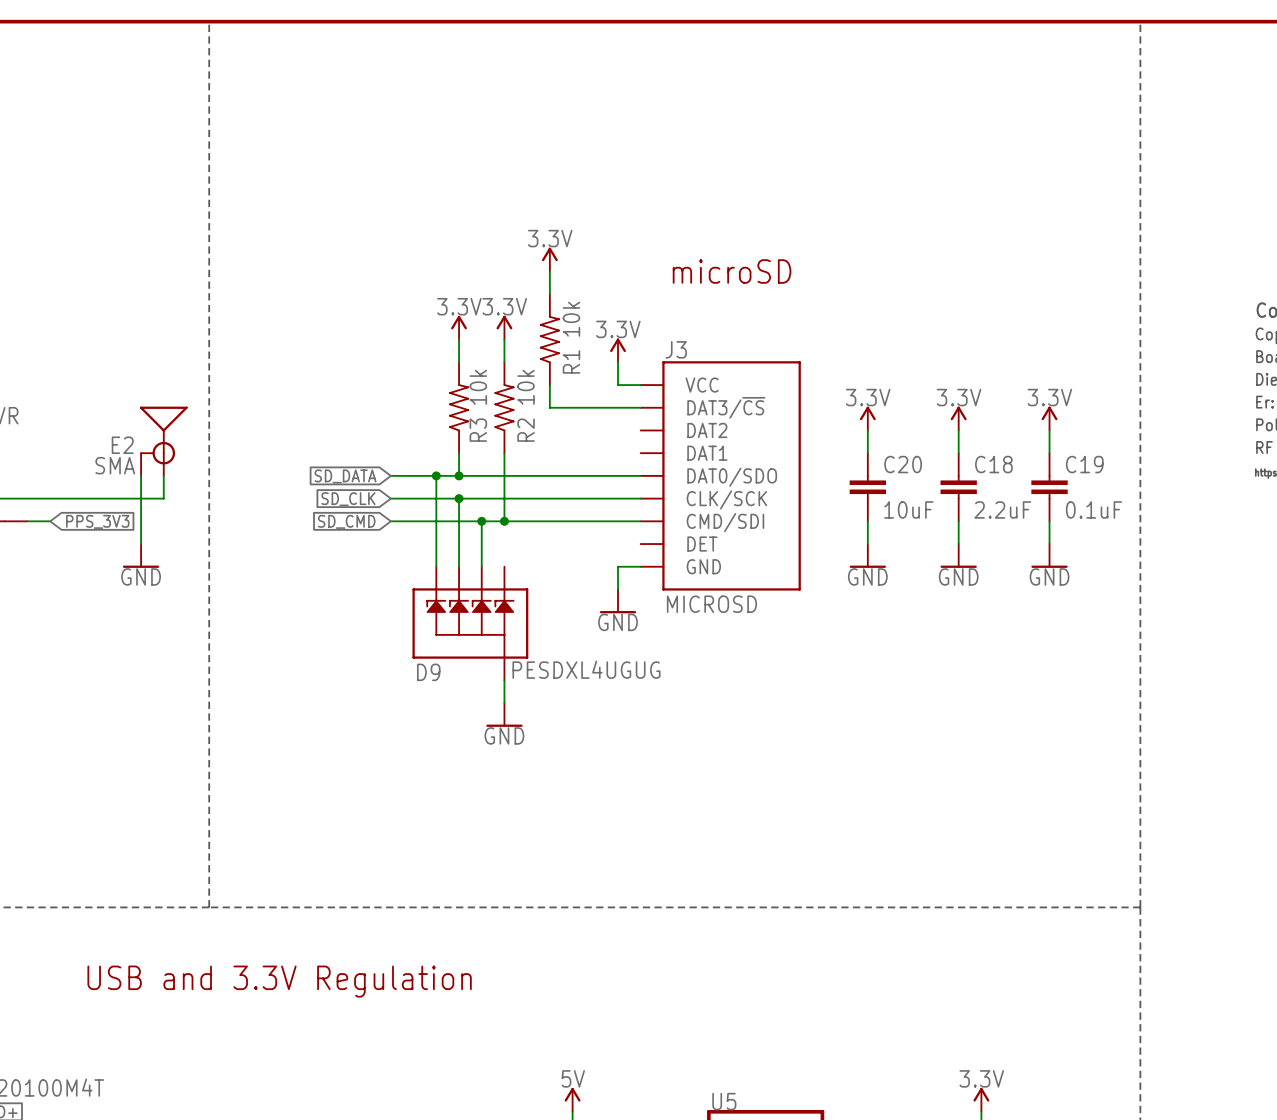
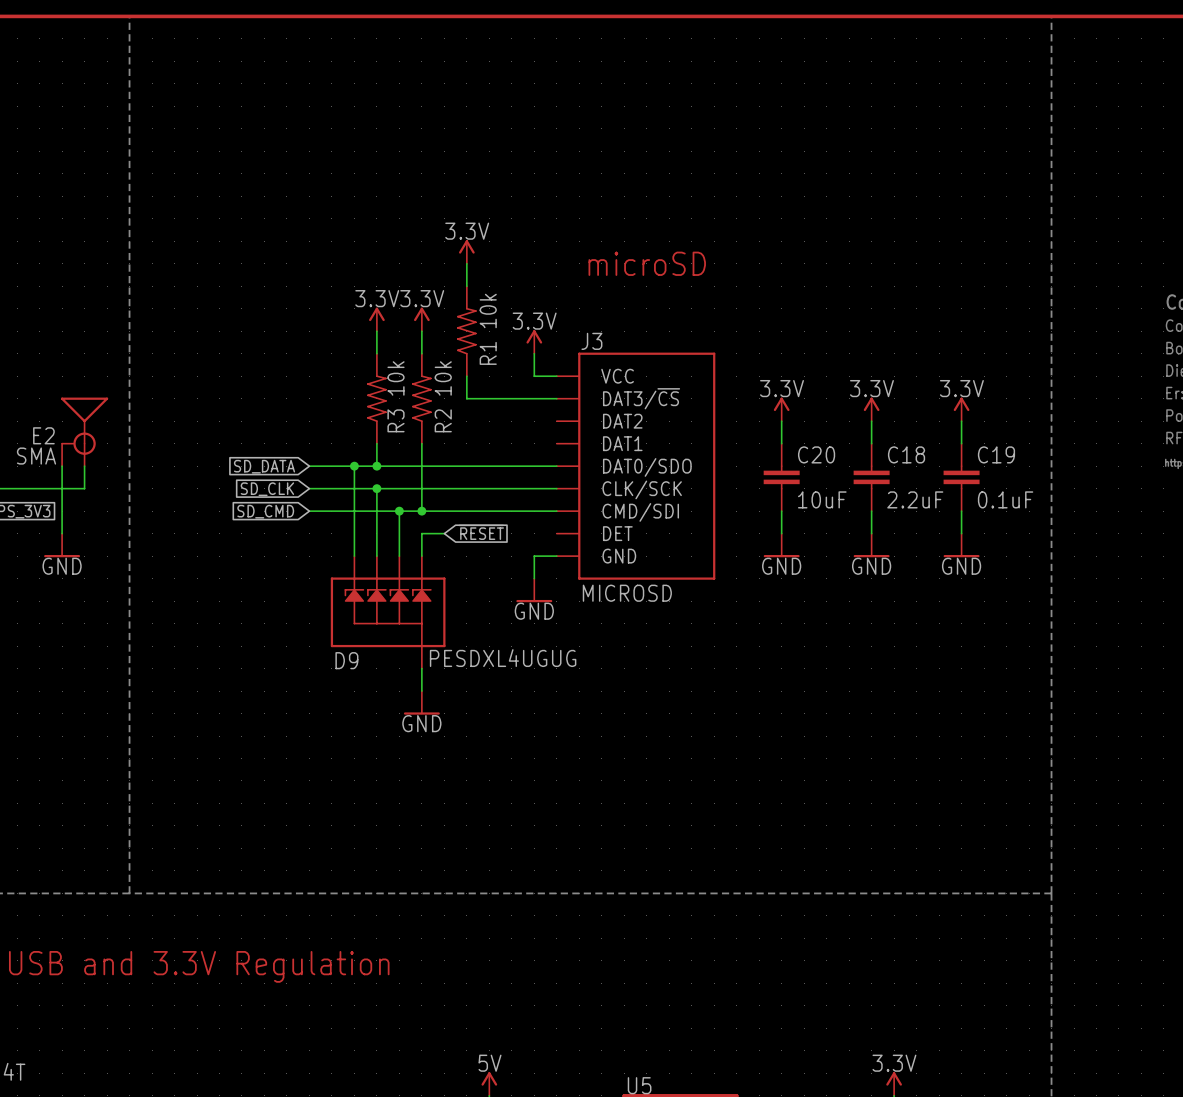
global label: none -> ~{RESET} (481, 532)
wire: none -> (444, 533) (421, 533) (421, 556)

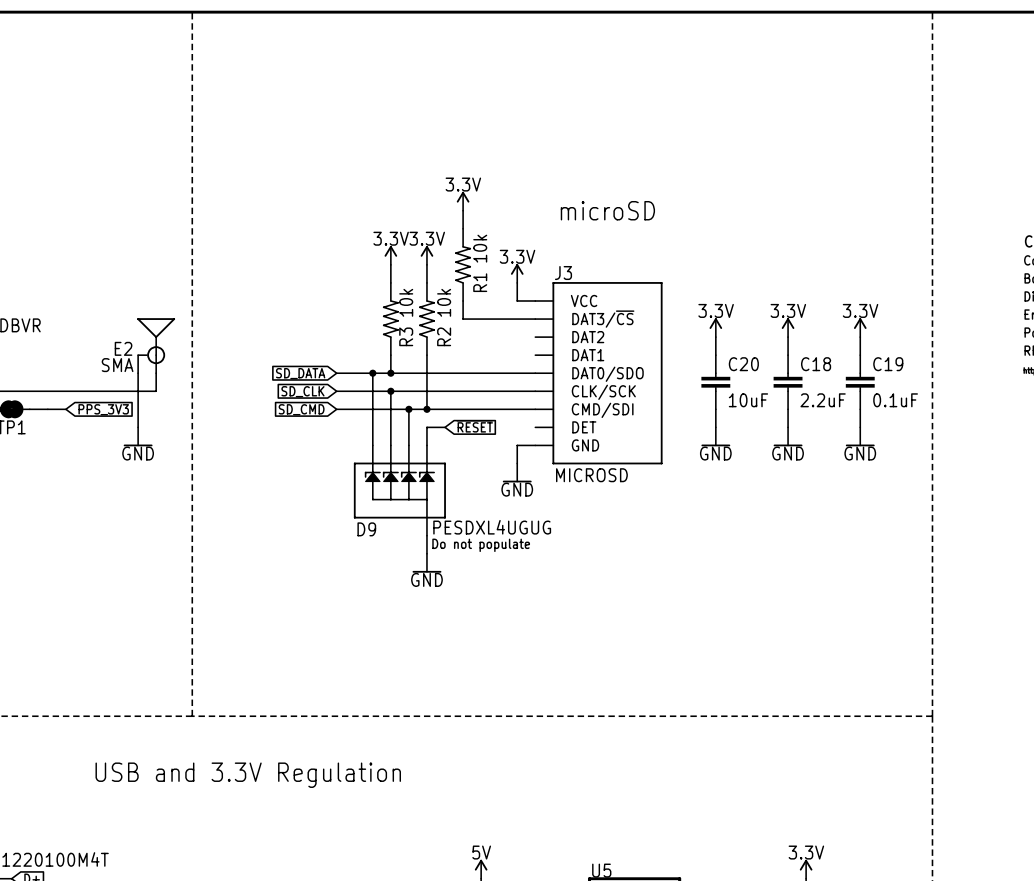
text: none -> Do not populate (481, 545)

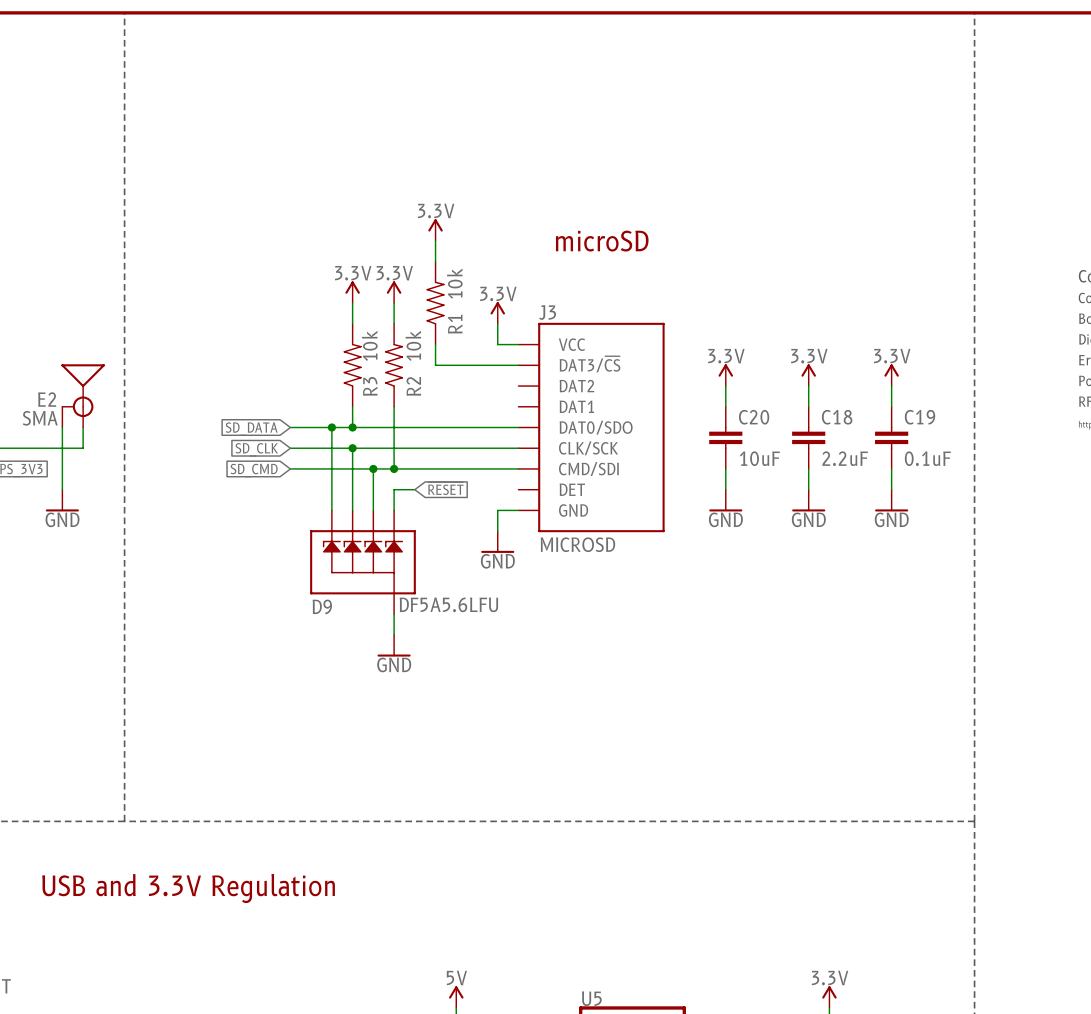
D9 value: PESDXL4UGUG (492, 527) -> DF5A5.6LFU (448, 604)
text: Do not populate (481, 545) -> none

